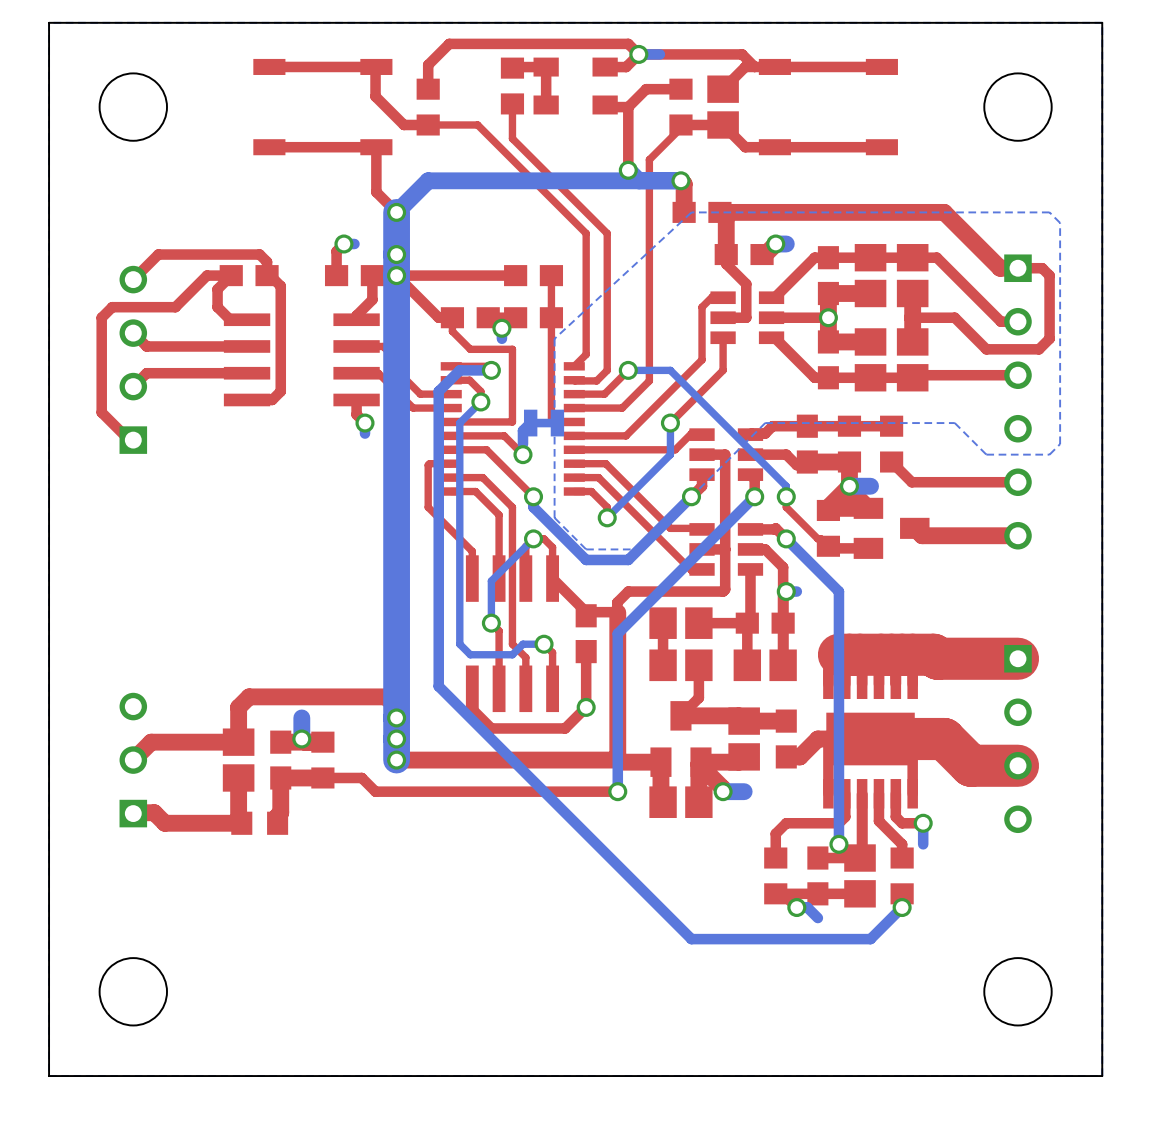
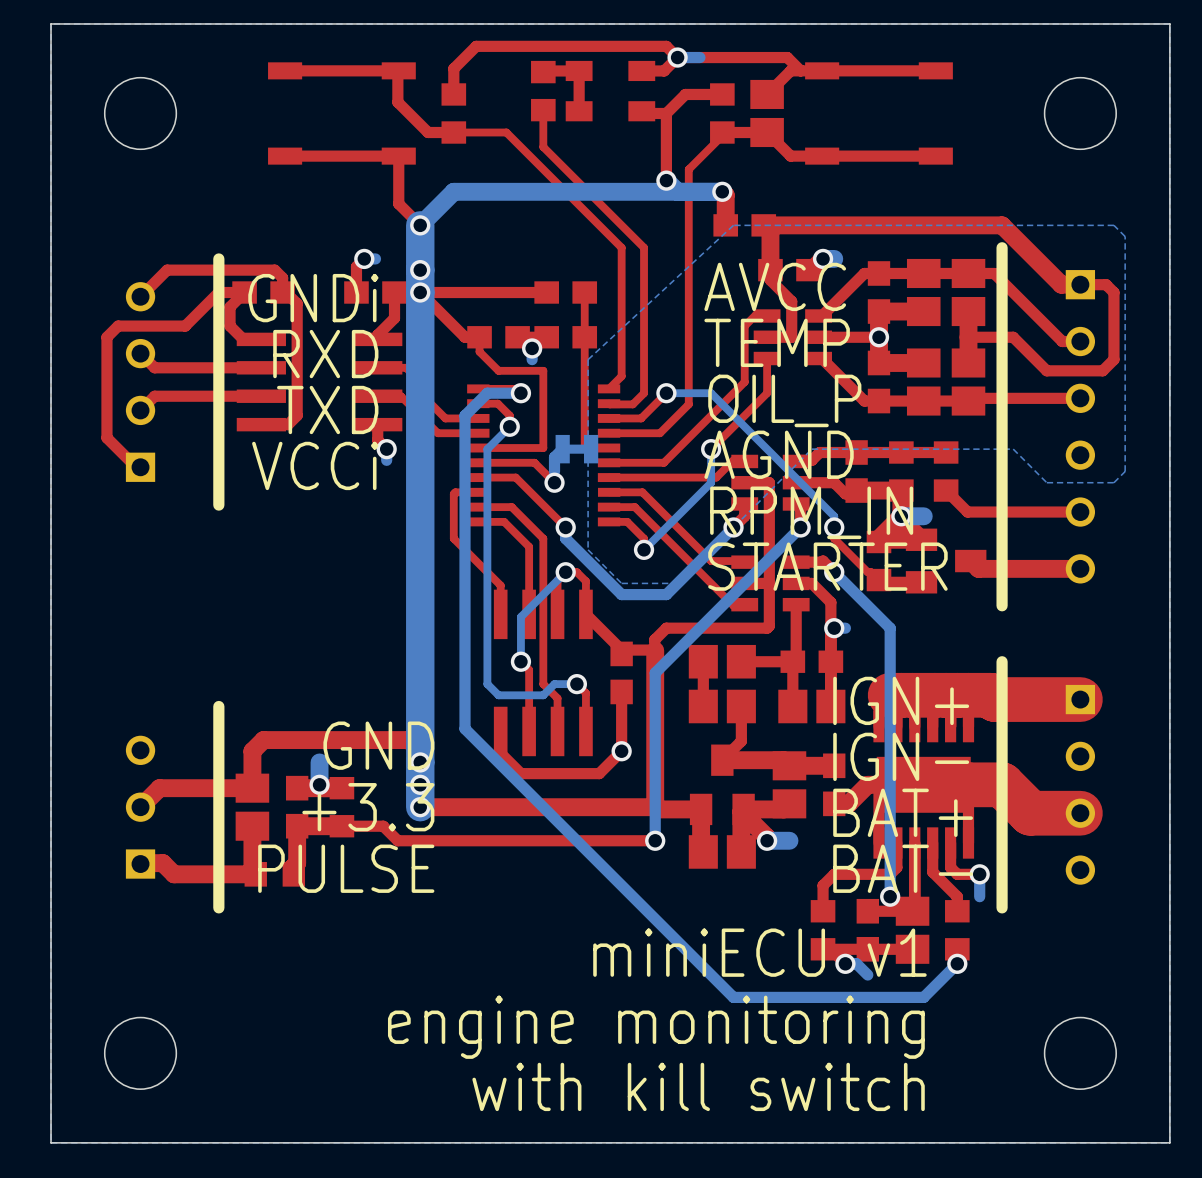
line: none -> (1002, 247) (1002, 605)
line: none -> (218, 258) (218, 505)
text: none -> AVCC (775, 286)
text: none -> GNDi (313, 298)
text: none -> TEMP (777, 342)
text: none -> RXD (325, 354)
text: none -> OIL_P (784, 400)
text: none -> TXD (327, 409)
text: none -> AGND (779, 454)
text: none -> VCCi (315, 465)
text: none -> RPM_IN (811, 512)
text: none -> STARTER (827, 566)
line: none -> (1002, 661) (1002, 907)
text: none -> IGN+ (901, 700)
line: none -> (218, 706) (218, 907)
text: none -> GND (378, 745)
text: none -> IGN- (901, 756)
text: none -> +3.3 (368, 807)
text: none -> BAT+ (903, 812)
text: none -> PULSE (346, 868)
text: none -> BAT- (903, 868)
text: none -> miniECU v1 (759, 952)
text: none -> engine monitoring (656, 1027)
text: none -> with kill switch (698, 1086)

